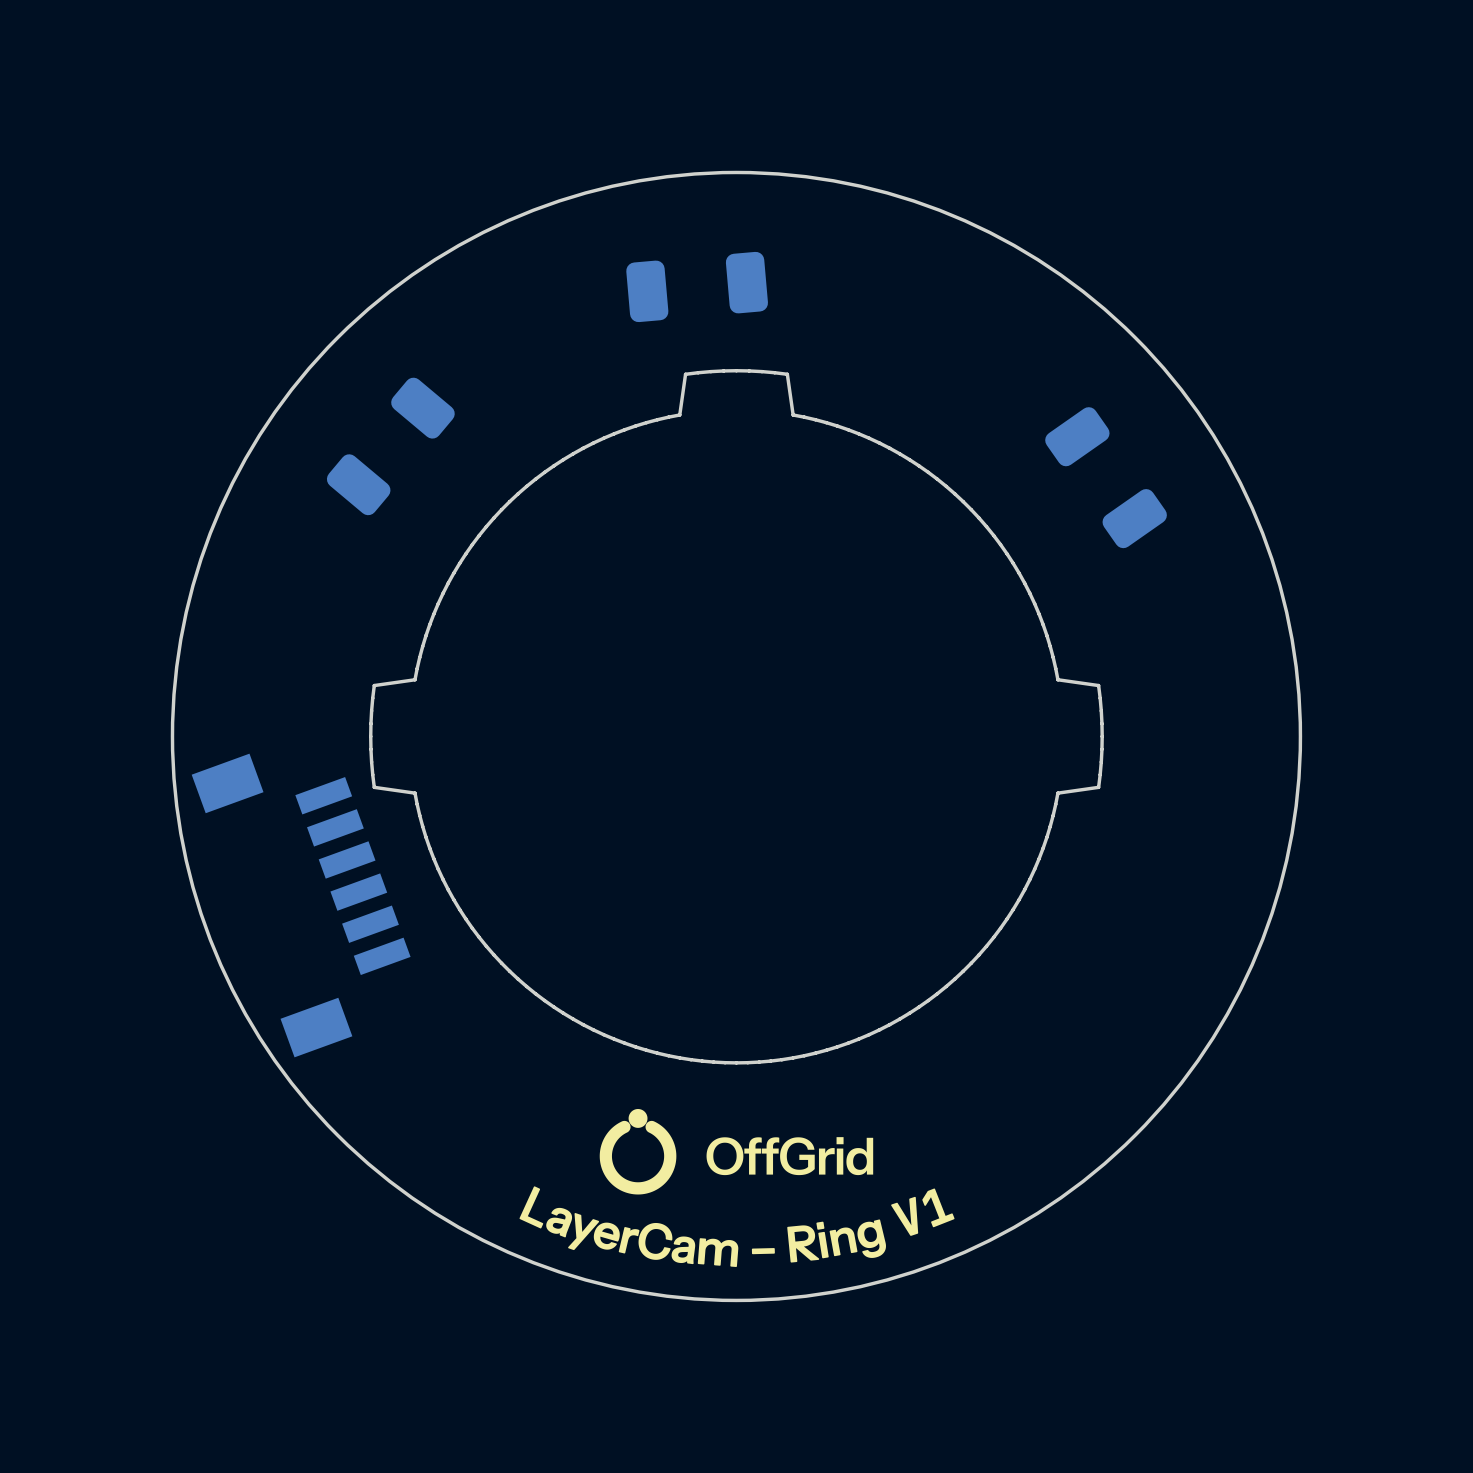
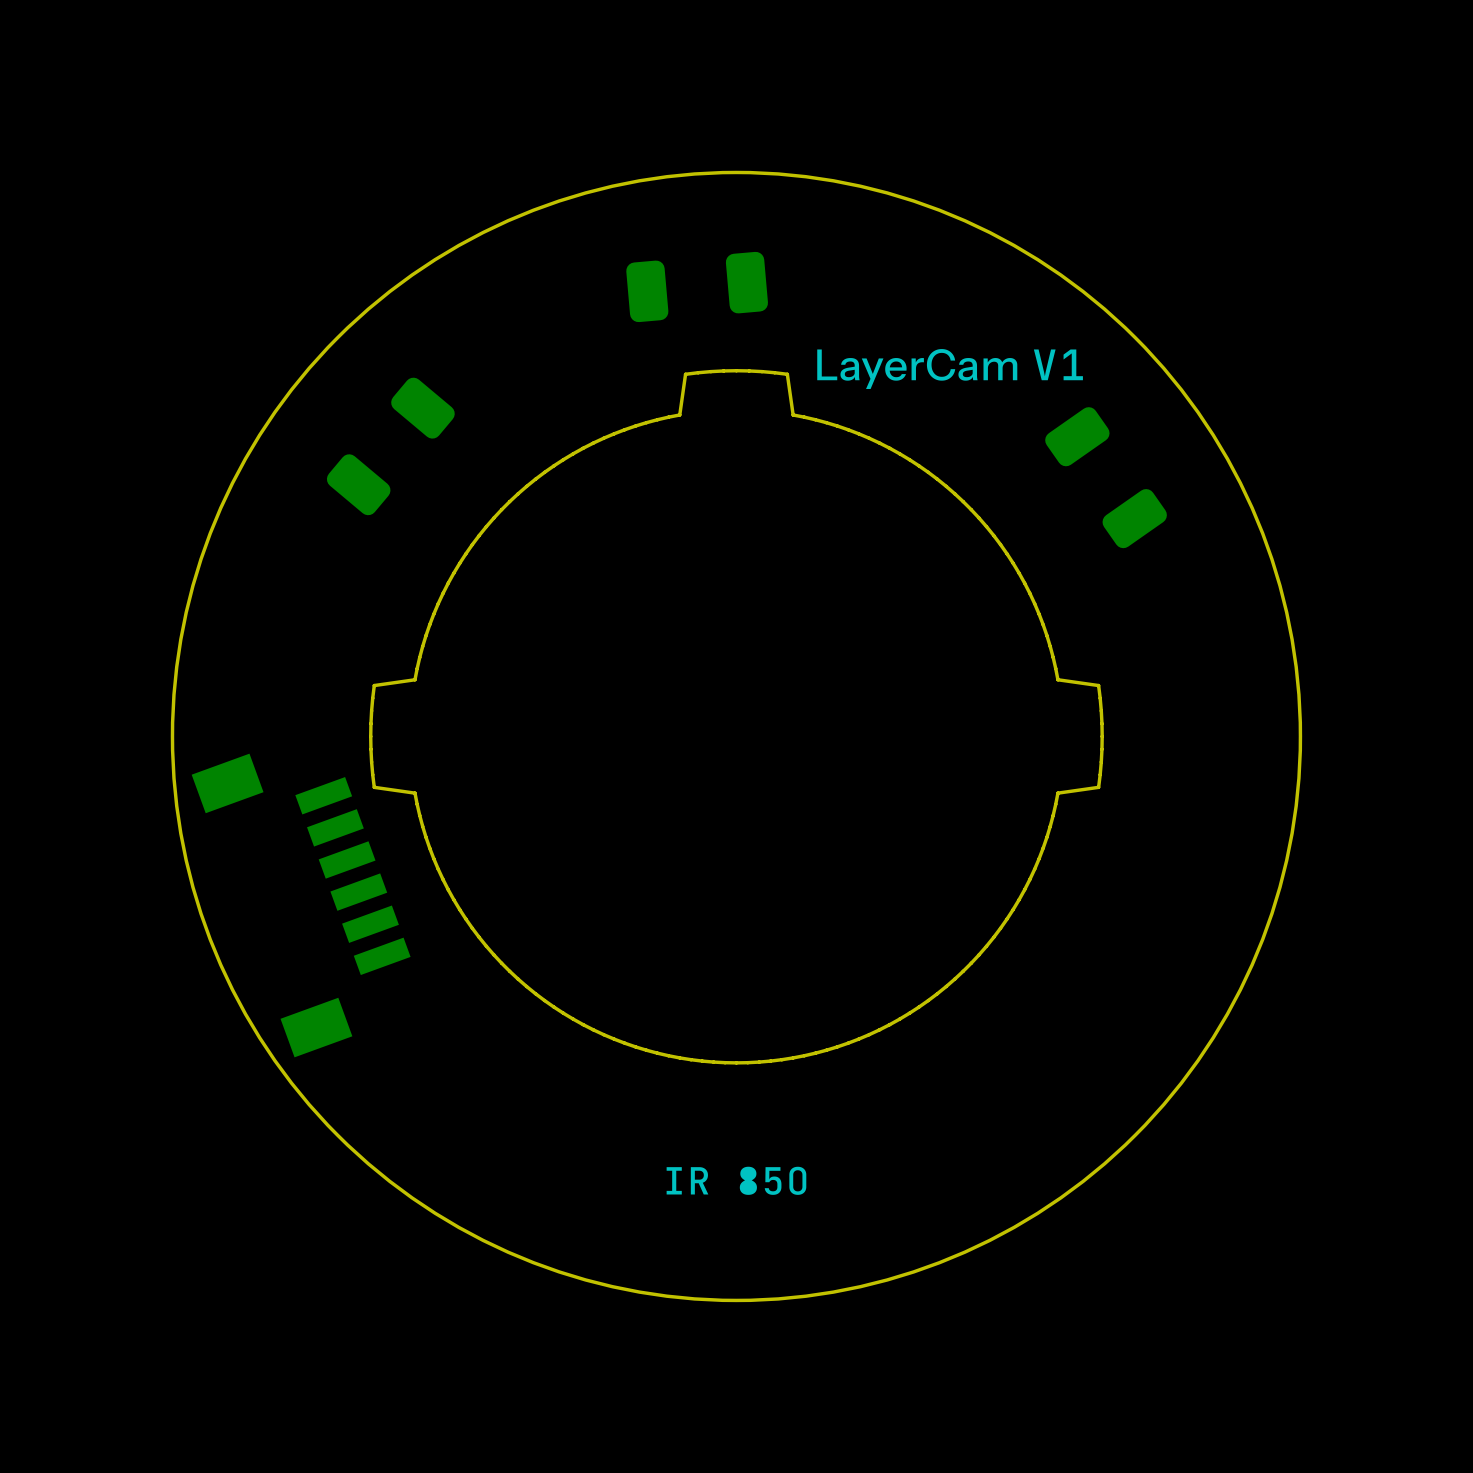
drawing: none -> [817, 349, 1083, 389]
drawing: [519, 1109, 955, 1267] -> none
drawing: none -> [666, 1166, 807, 1195]

